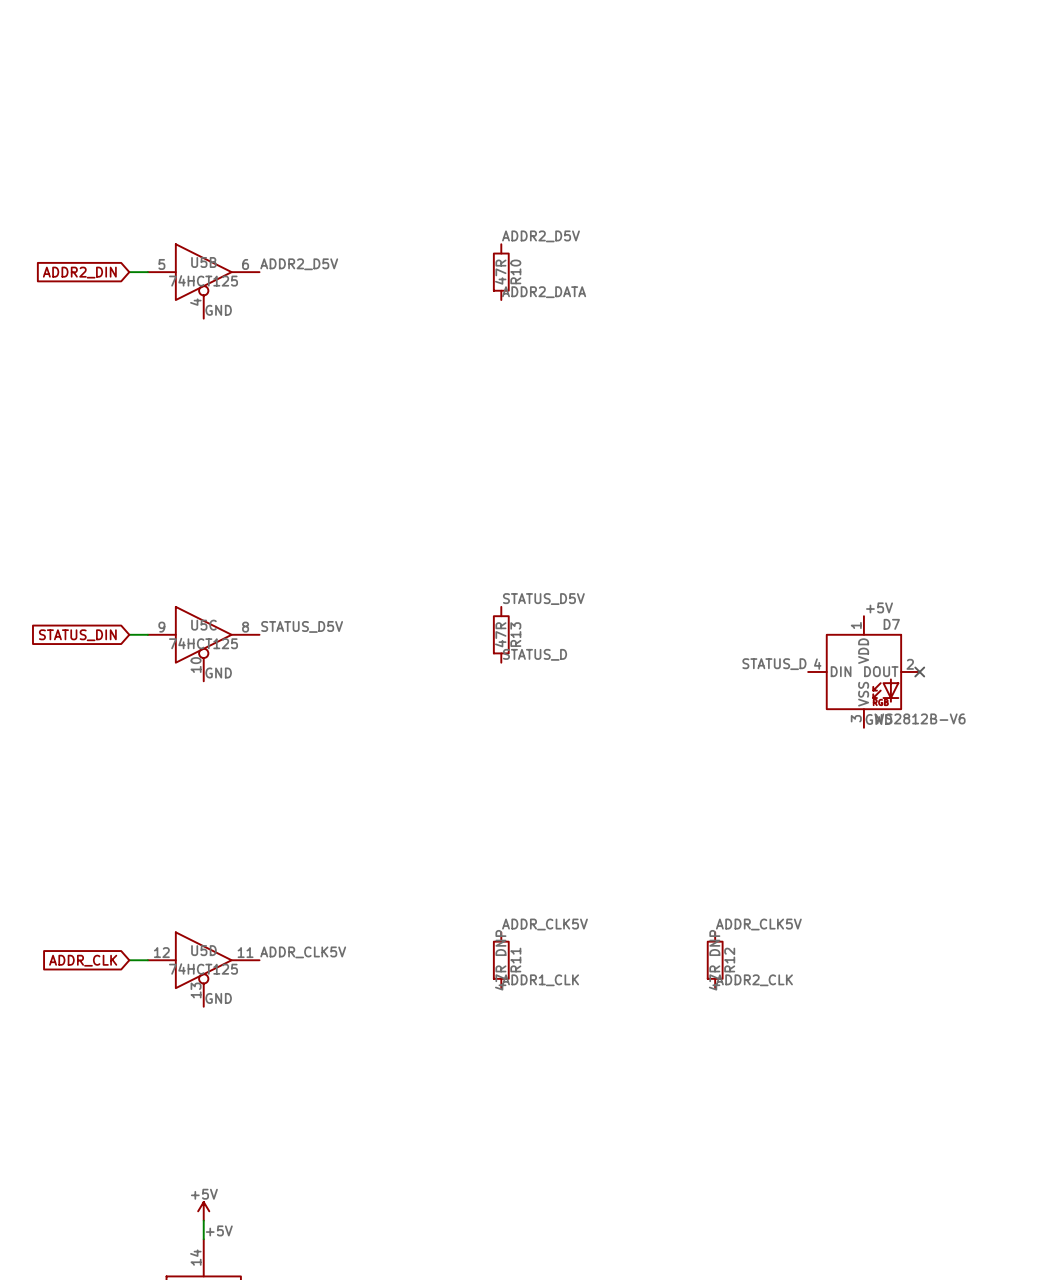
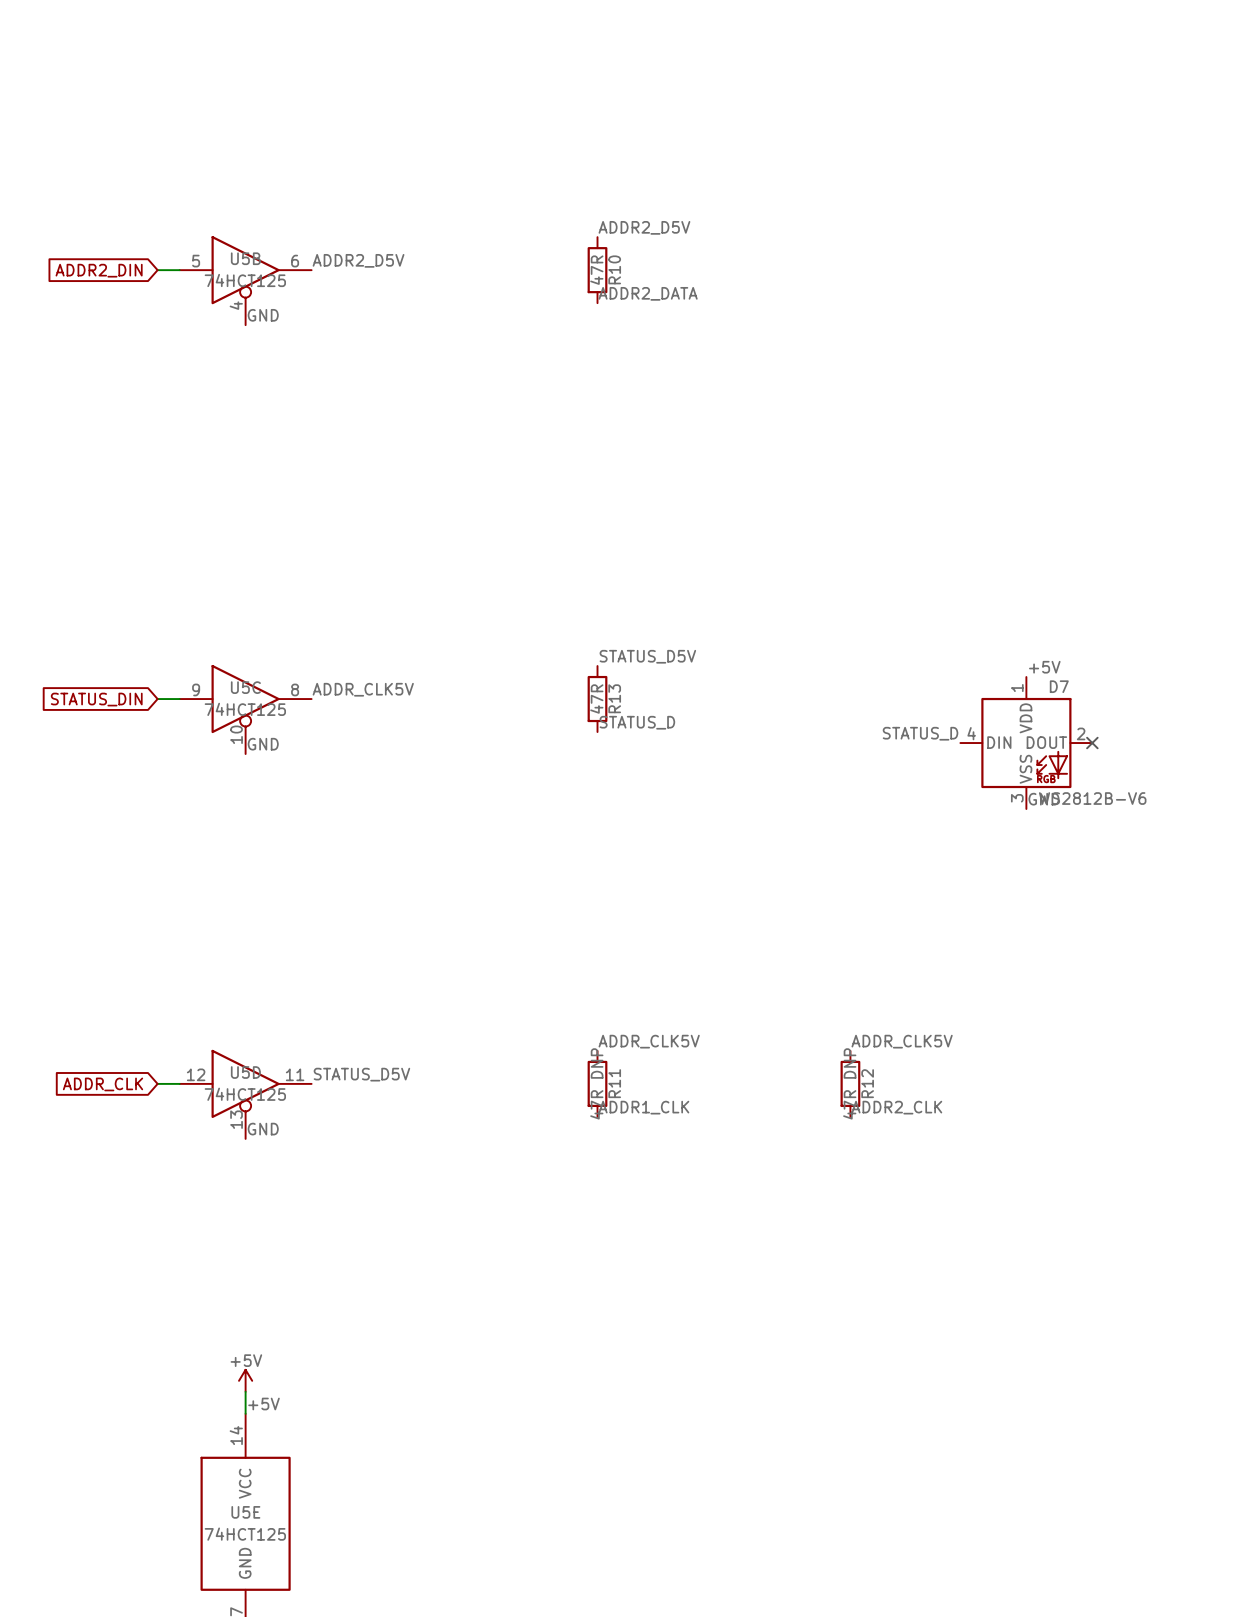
label: STATUS_D5V (302, 626) -> ADDR_CLK5V (363, 689)
label: ADDR_CLK5V (303, 952) -> STATUS_D5V (361, 1074)

